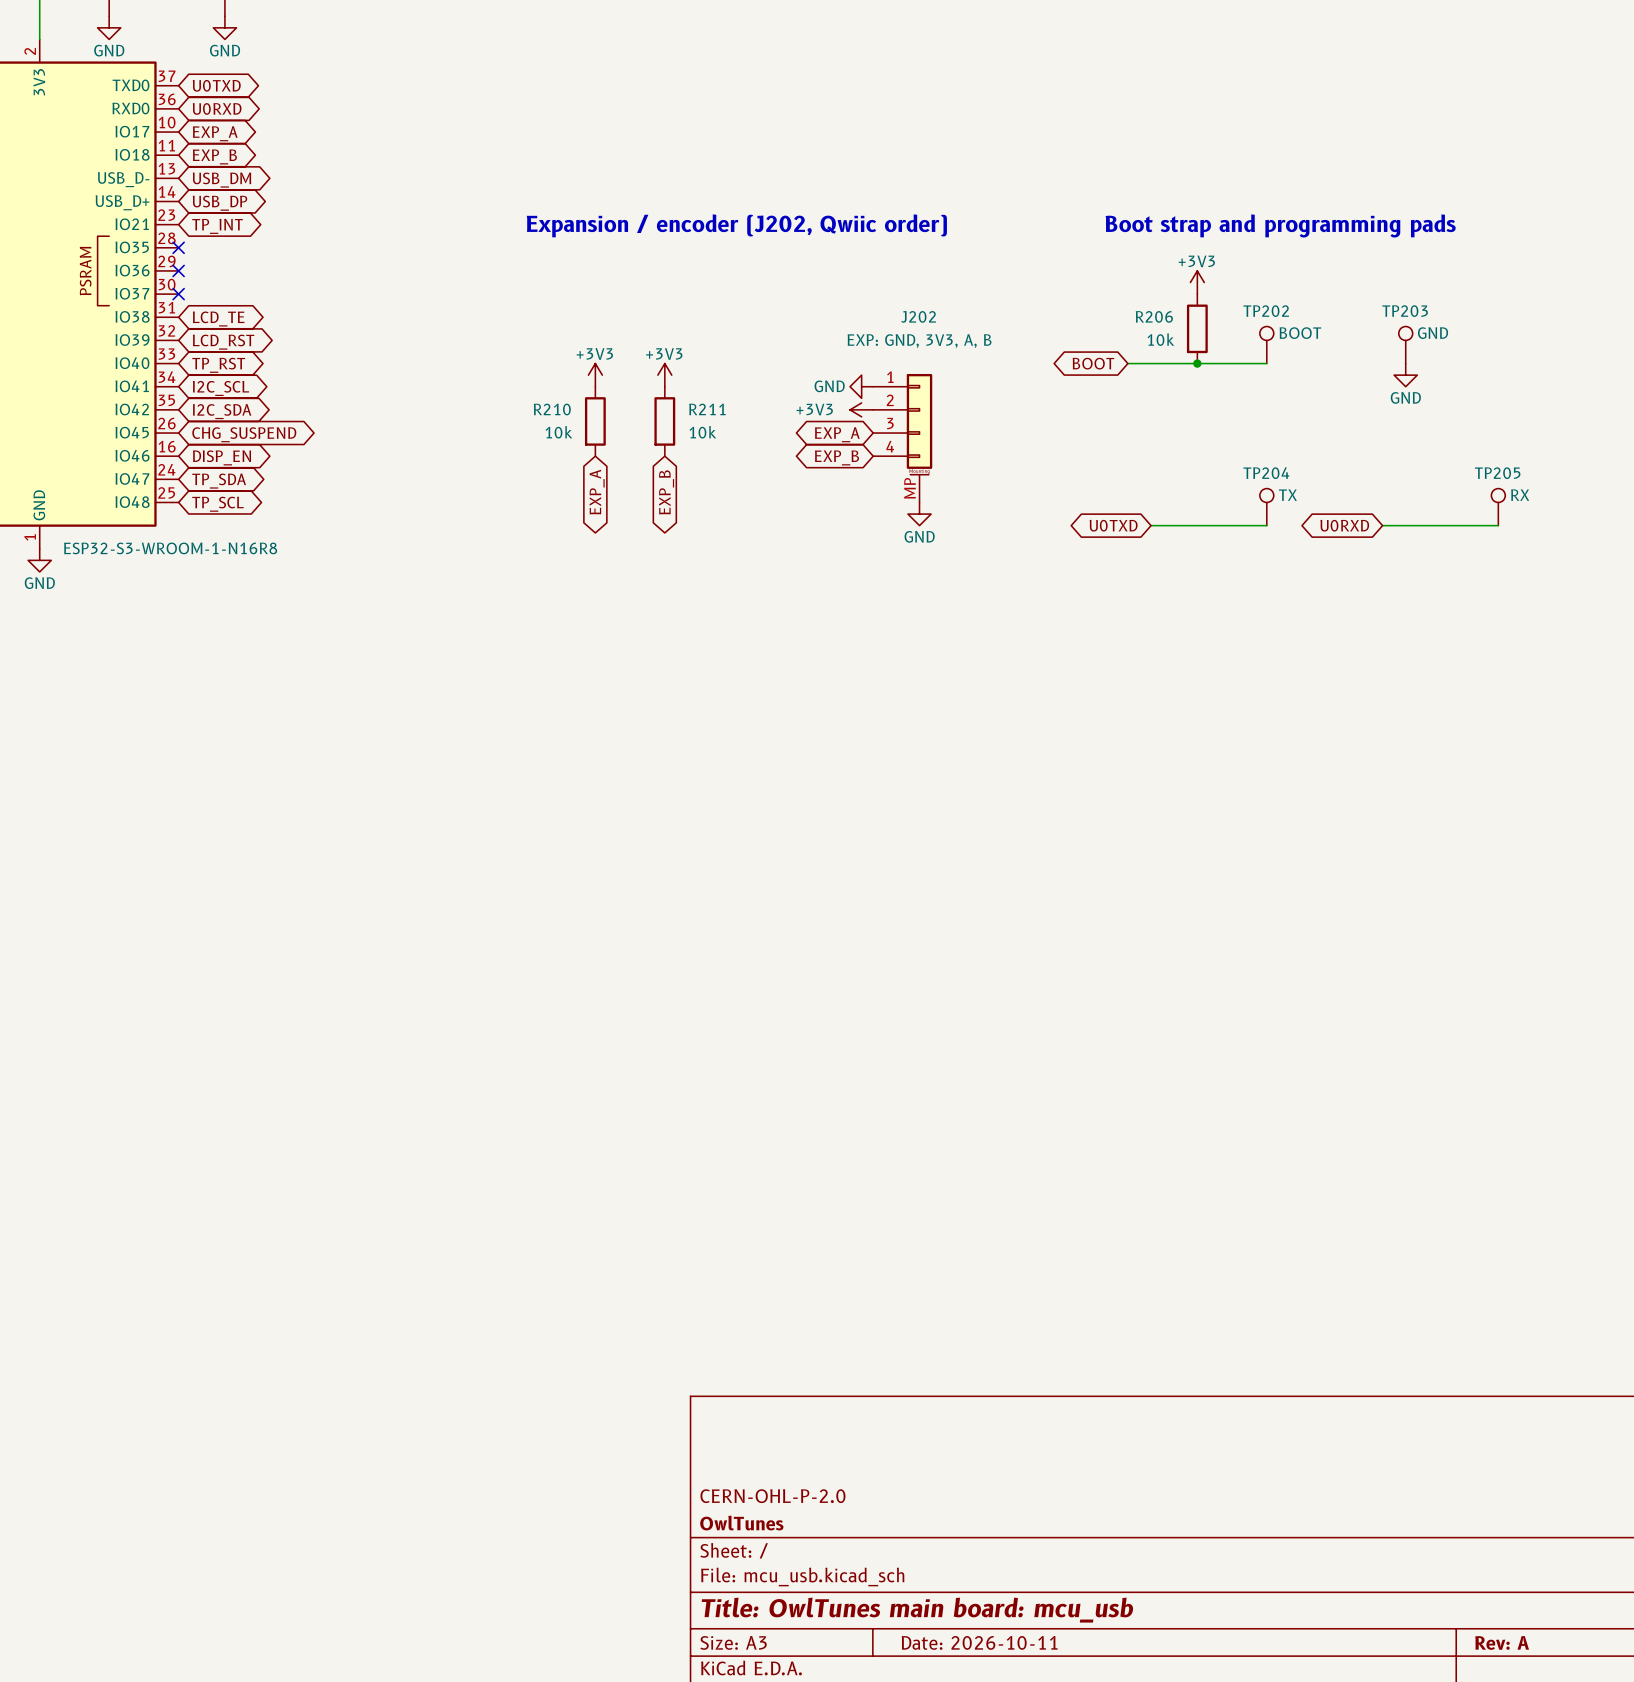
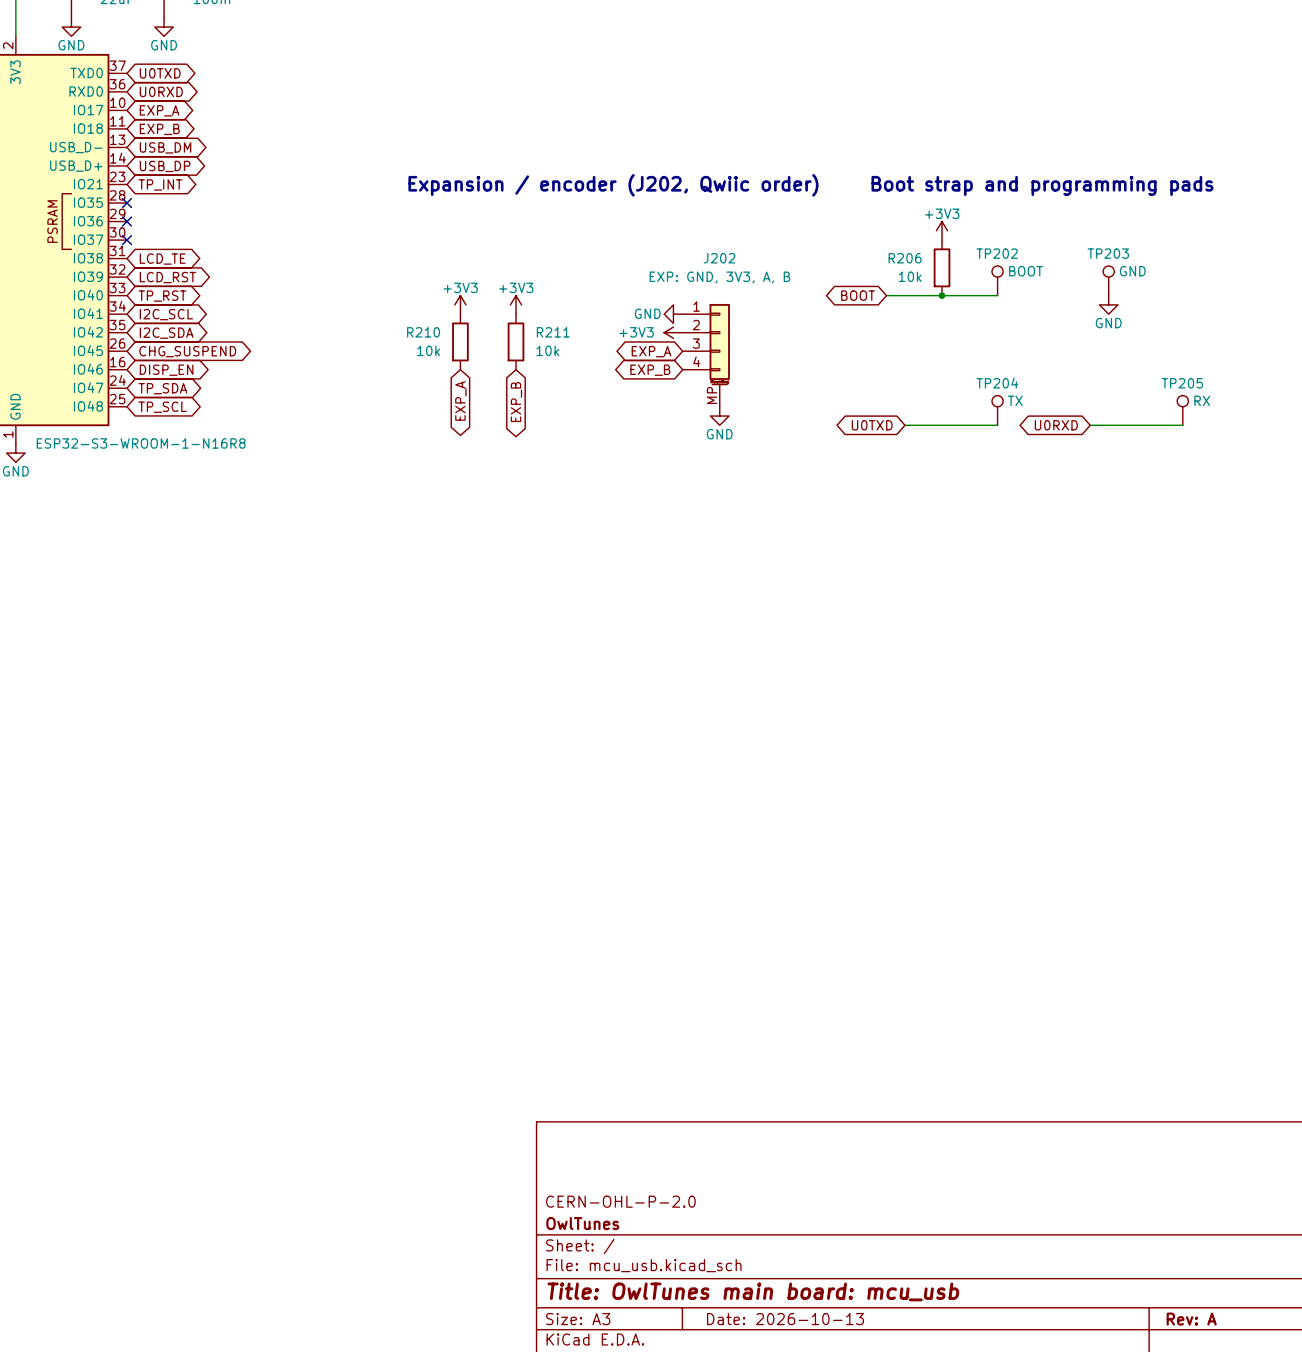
title block: Date: 2026-10-11 (979, 1642) -> Date: 2026-10-13 (785, 1319)

